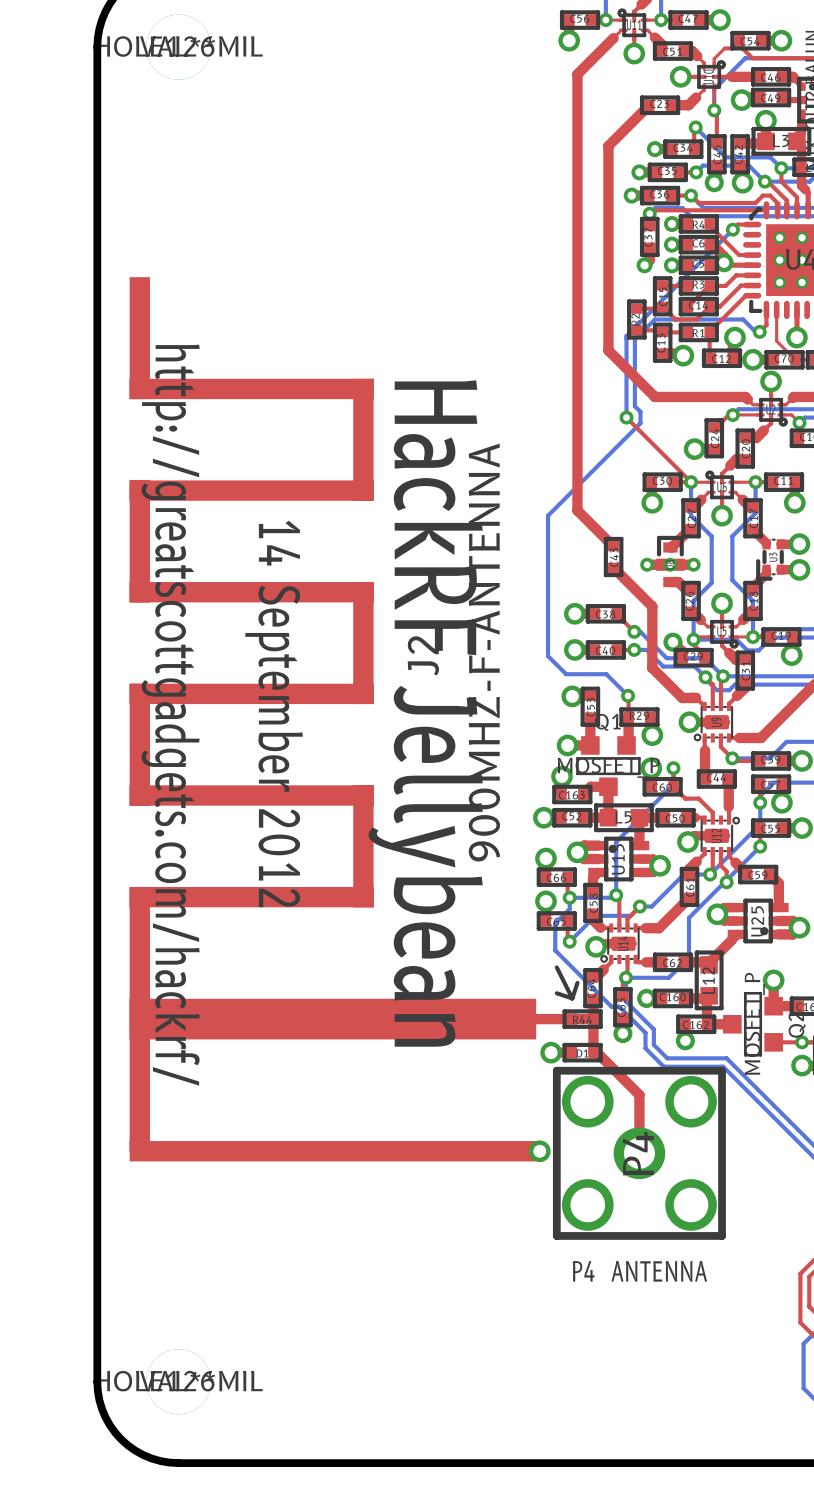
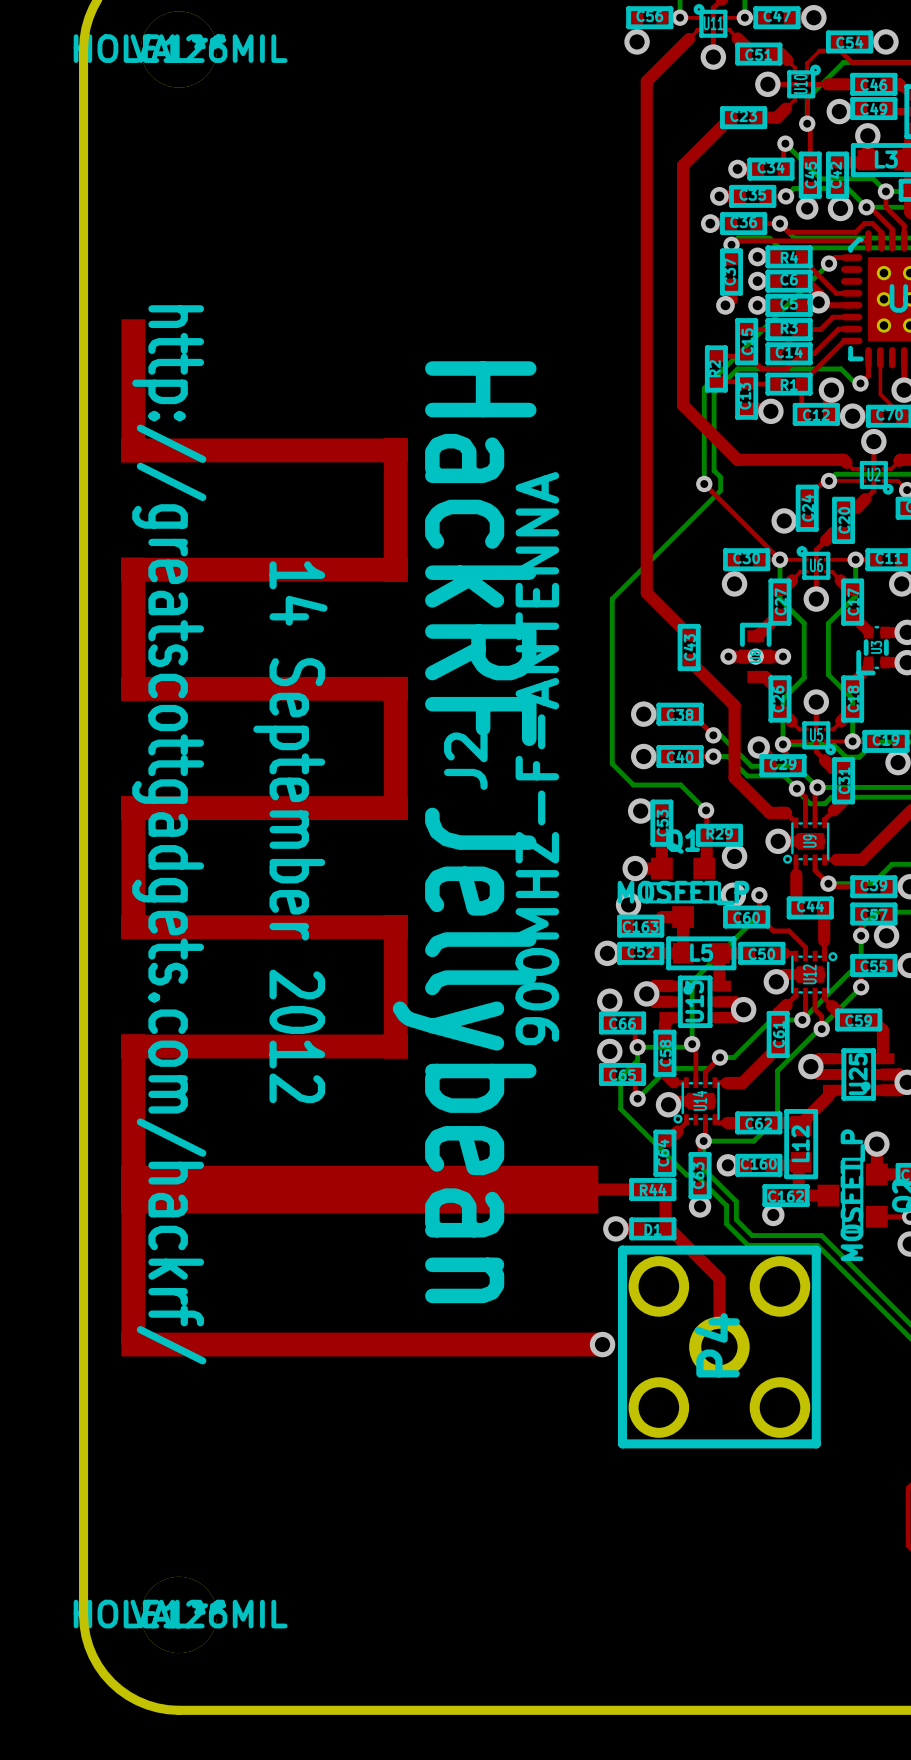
line: (556, 967) (572, 998) -> none
line: (577, 982) (572, 998) -> none
line: (556, 993) (572, 998) -> none
text: P4 ANTENNA (639, 1271) -> none

